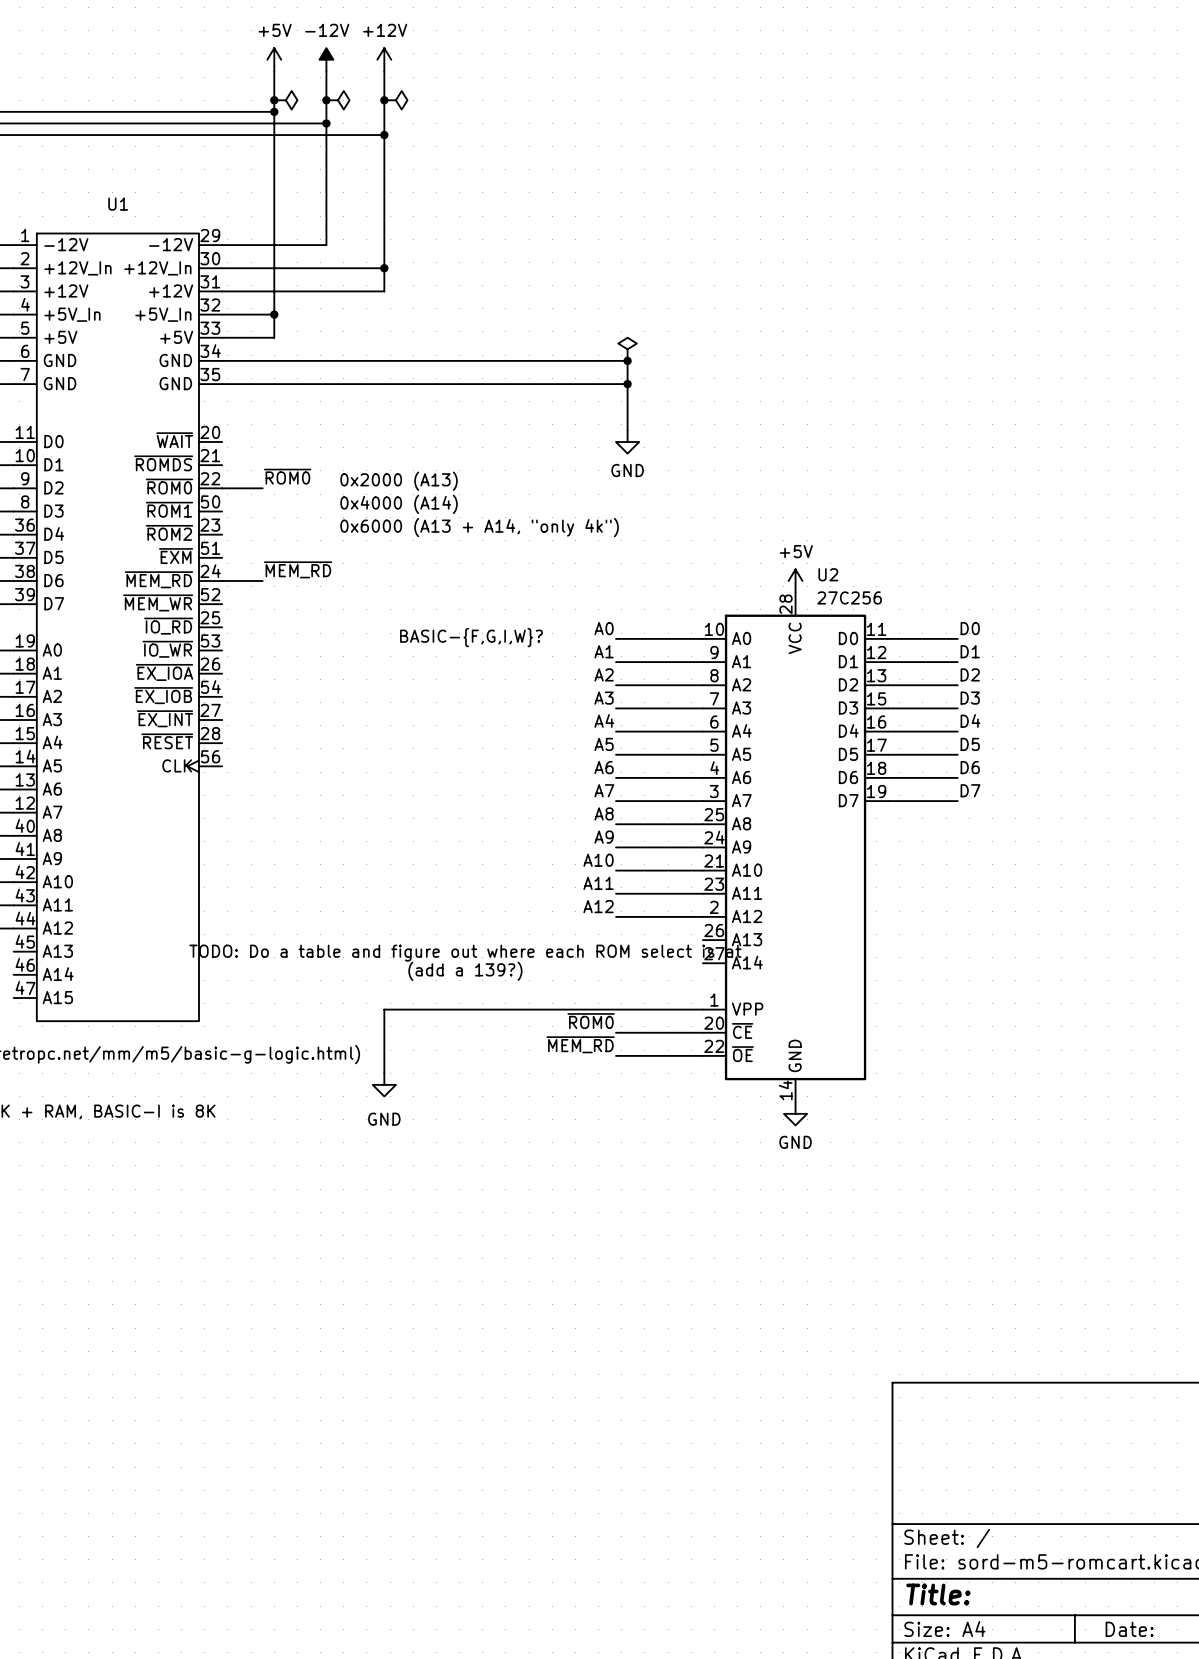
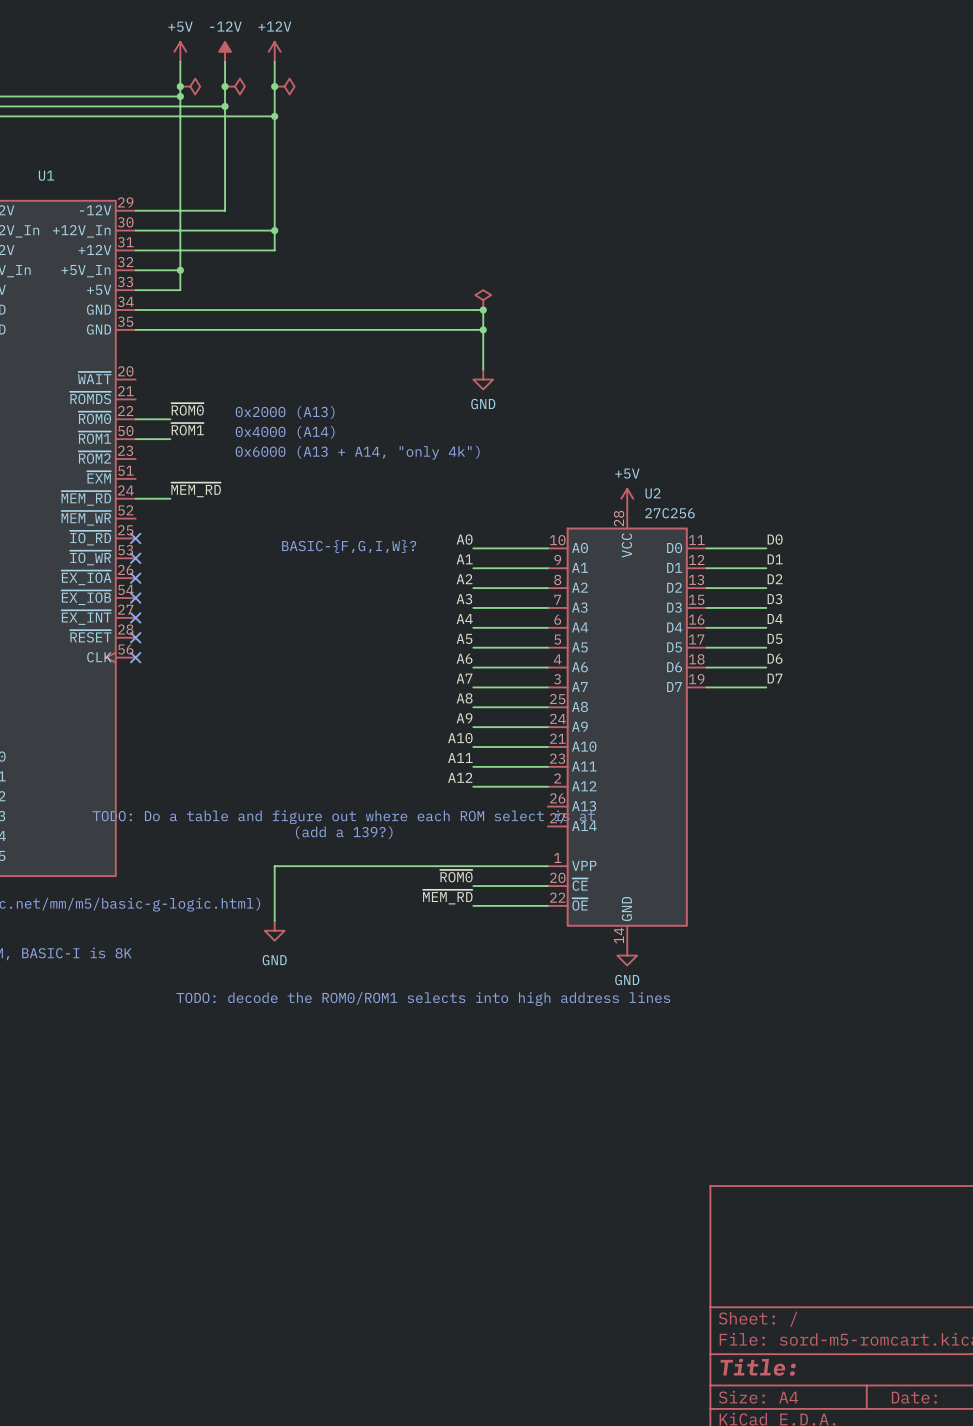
label: none -> ~{ROM1} (187, 429)
wire: none -> (135, 439) (170, 439)
no-connect mark: none -> (135, 538)
no-connect mark: none -> (135, 558)
no-connect mark: none -> (135, 578)
no-connect mark: none -> (135, 598)
no-connect mark: none -> (135, 617)
no-connect mark: none -> (135, 637)
no-connect mark: none -> (135, 657)
text: none -> TODO: decode the ROM0/ROM1 selects into high address lines (423, 999)

